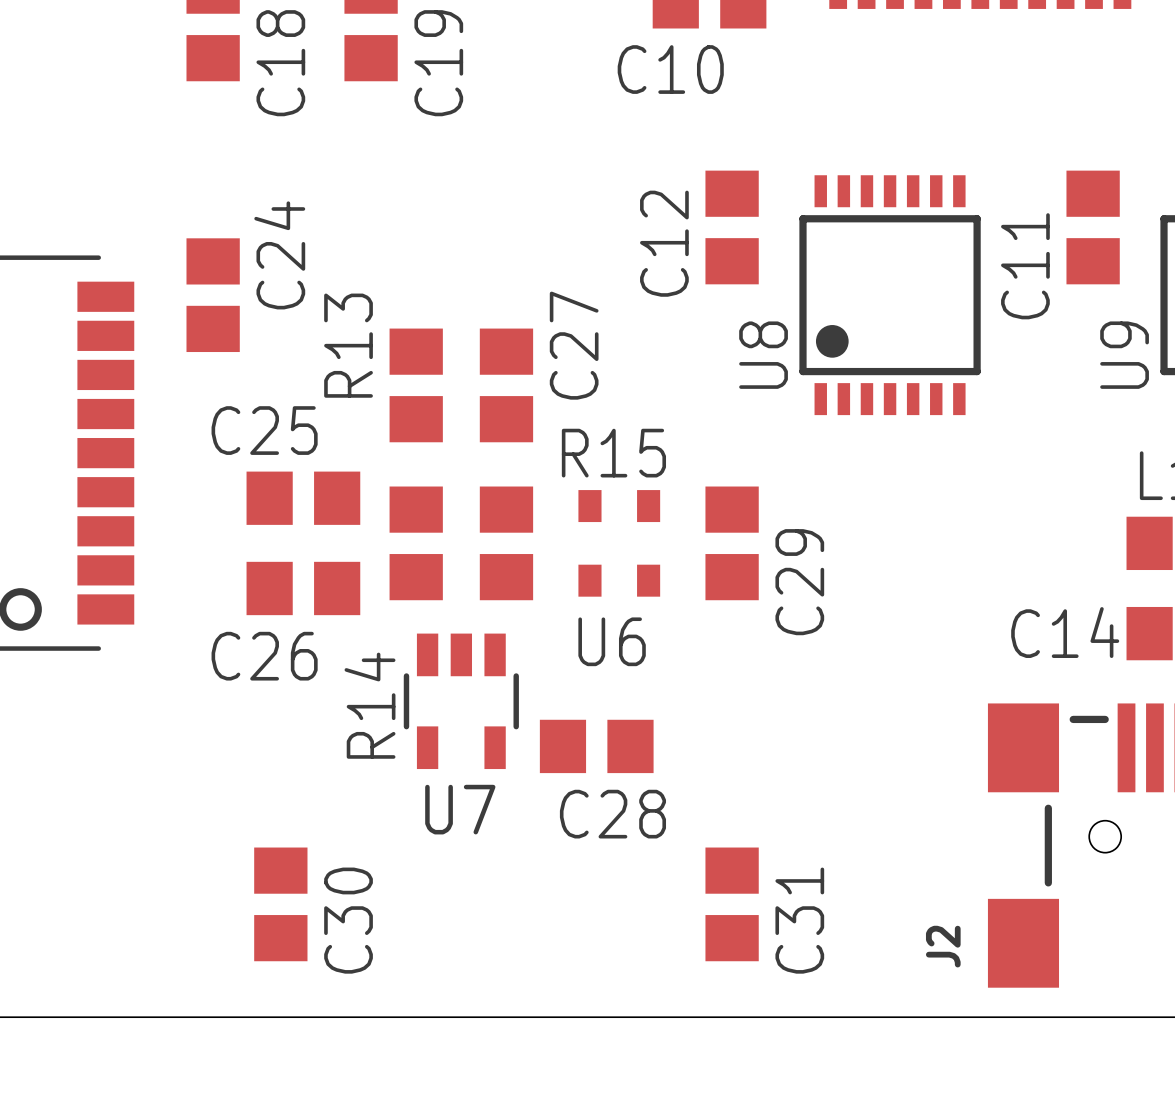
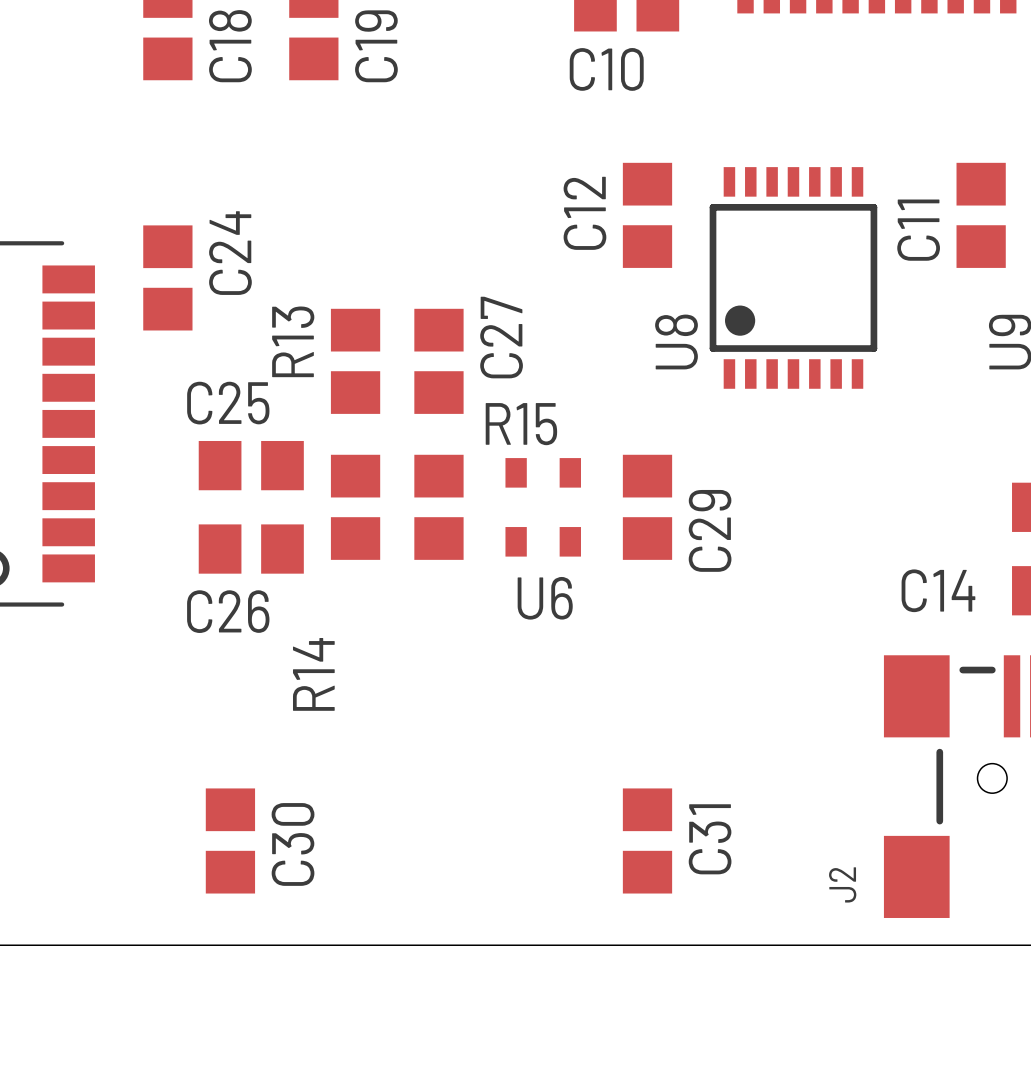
U7: (461, 701) -> none
C28: (596, 746) -> none

